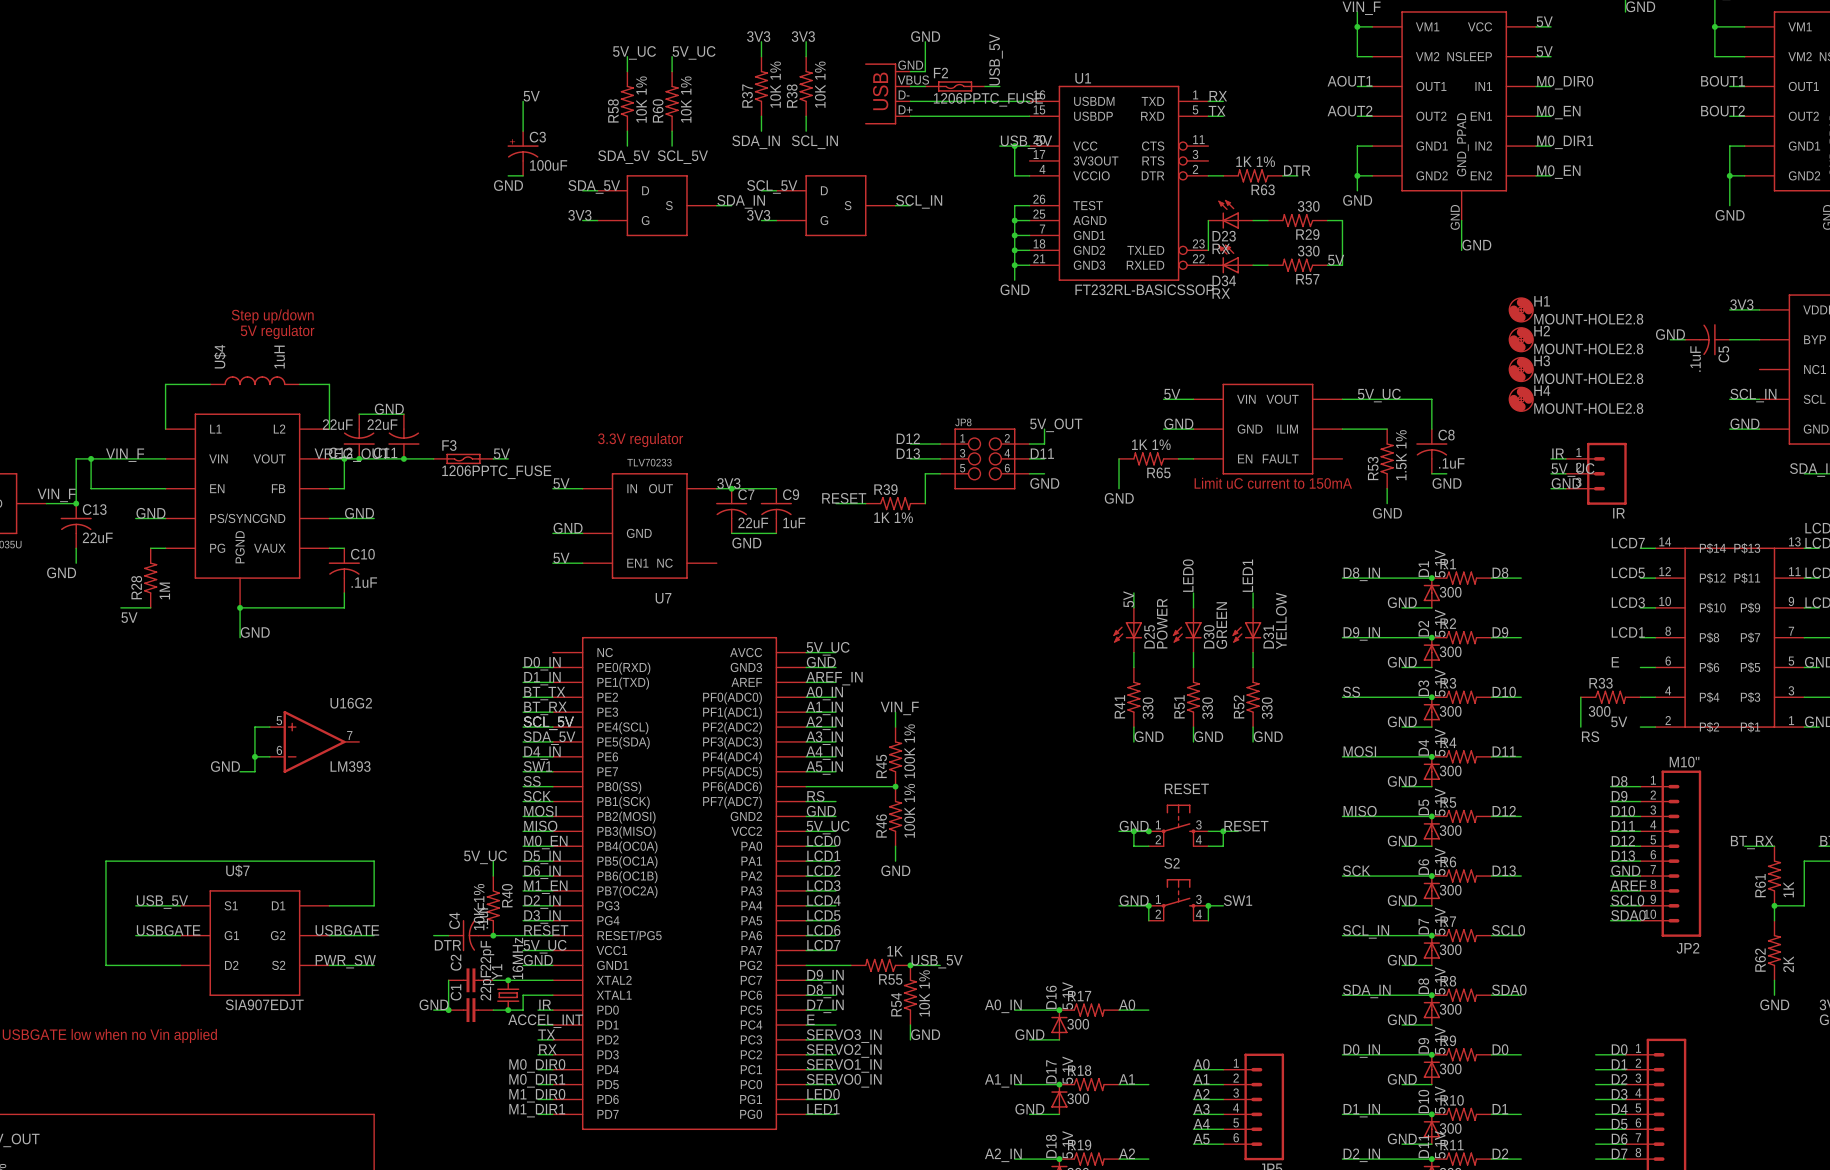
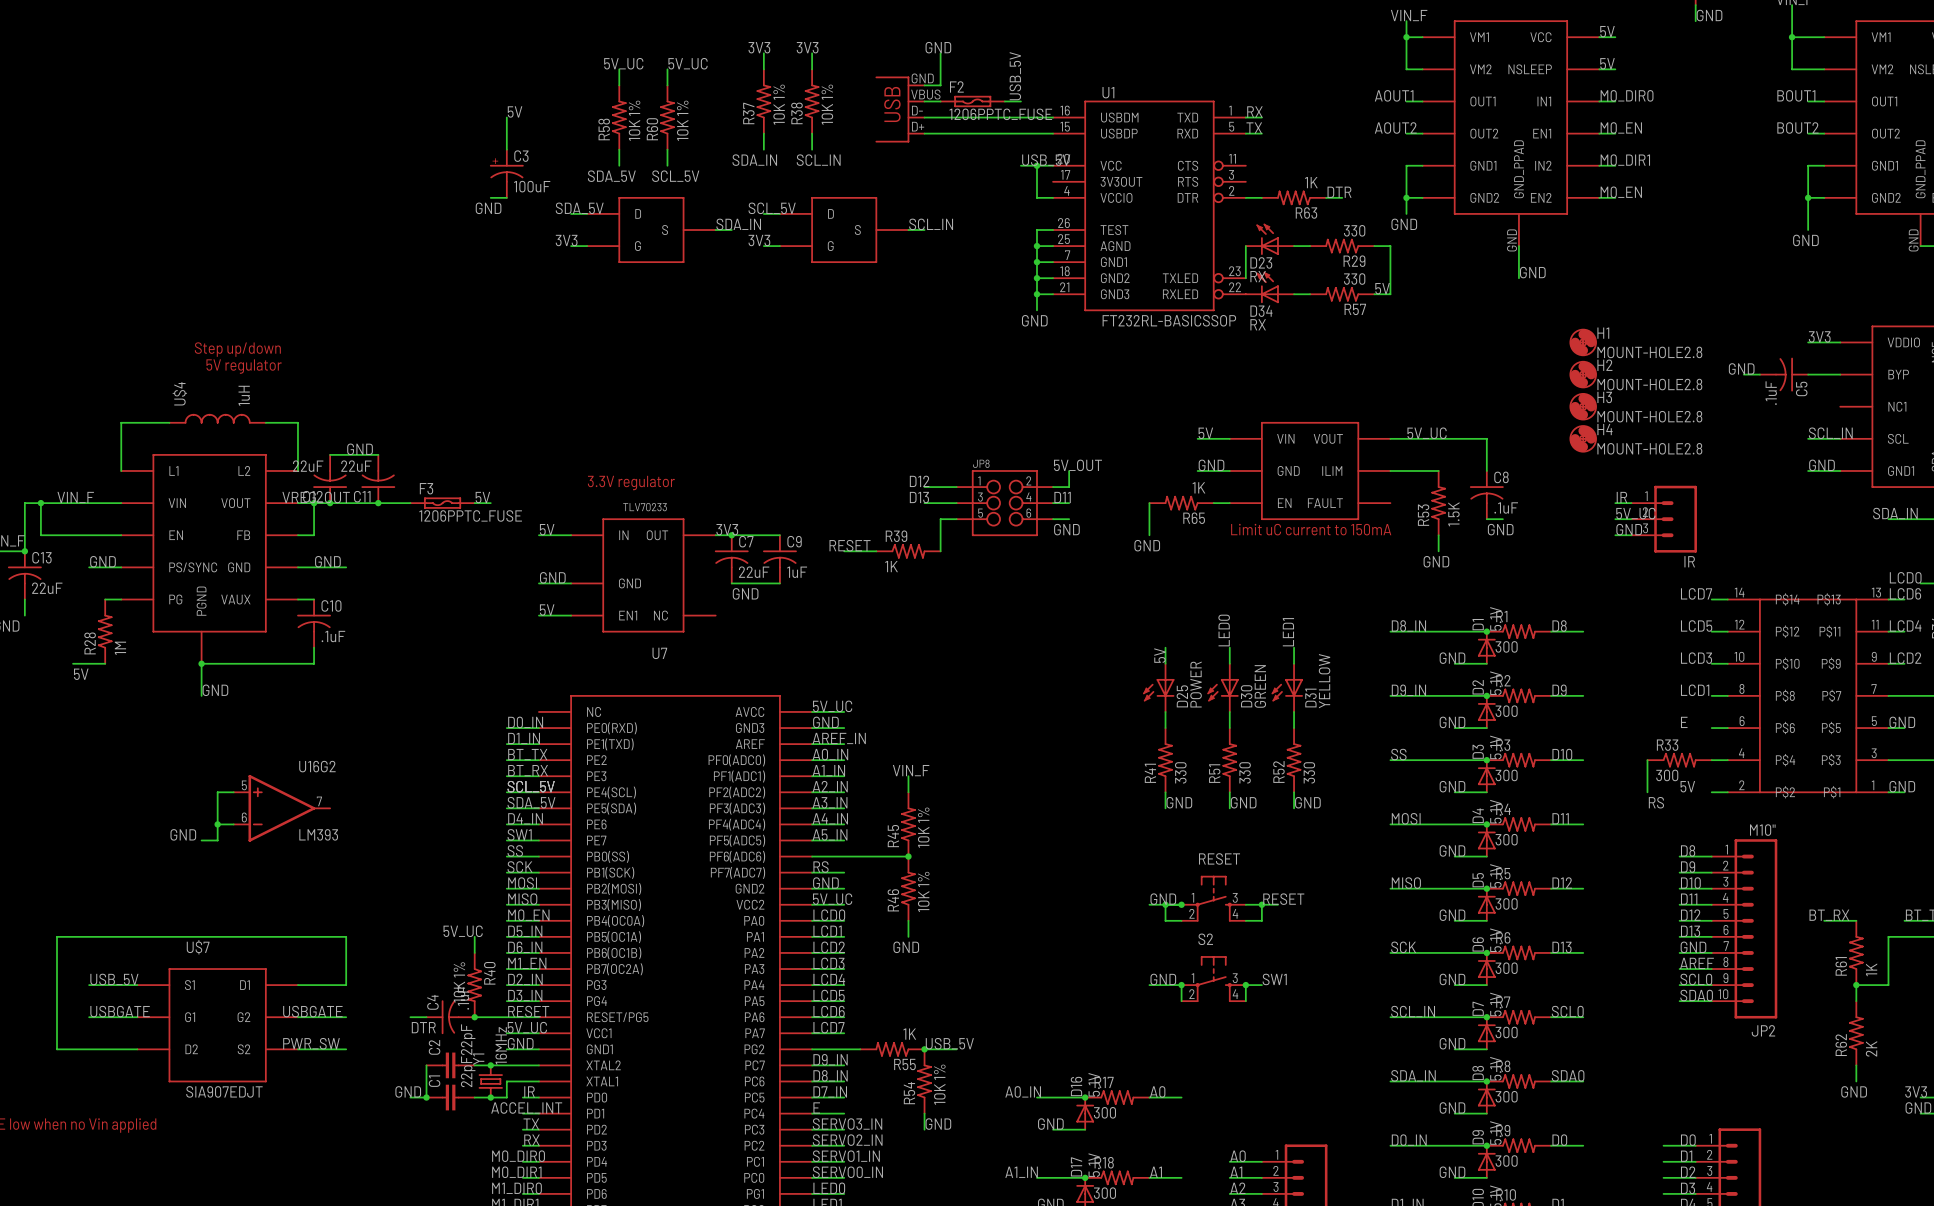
R63 value: 1K 1% (1255, 161) -> 1K (1311, 182)
R65 value: 1K 1% (1151, 444) -> 1K (1198, 487)
R53 value: 1.5K 1% (1401, 455) -> 1.5K (1453, 514)
R39 value: 1K 1% (893, 517) -> 1K (891, 566)
R45 value: 100K 1% (909, 751) -> 10K 1% (923, 827)
R46 value: 100K 1% (909, 810) -> 10K 1% (923, 891)

